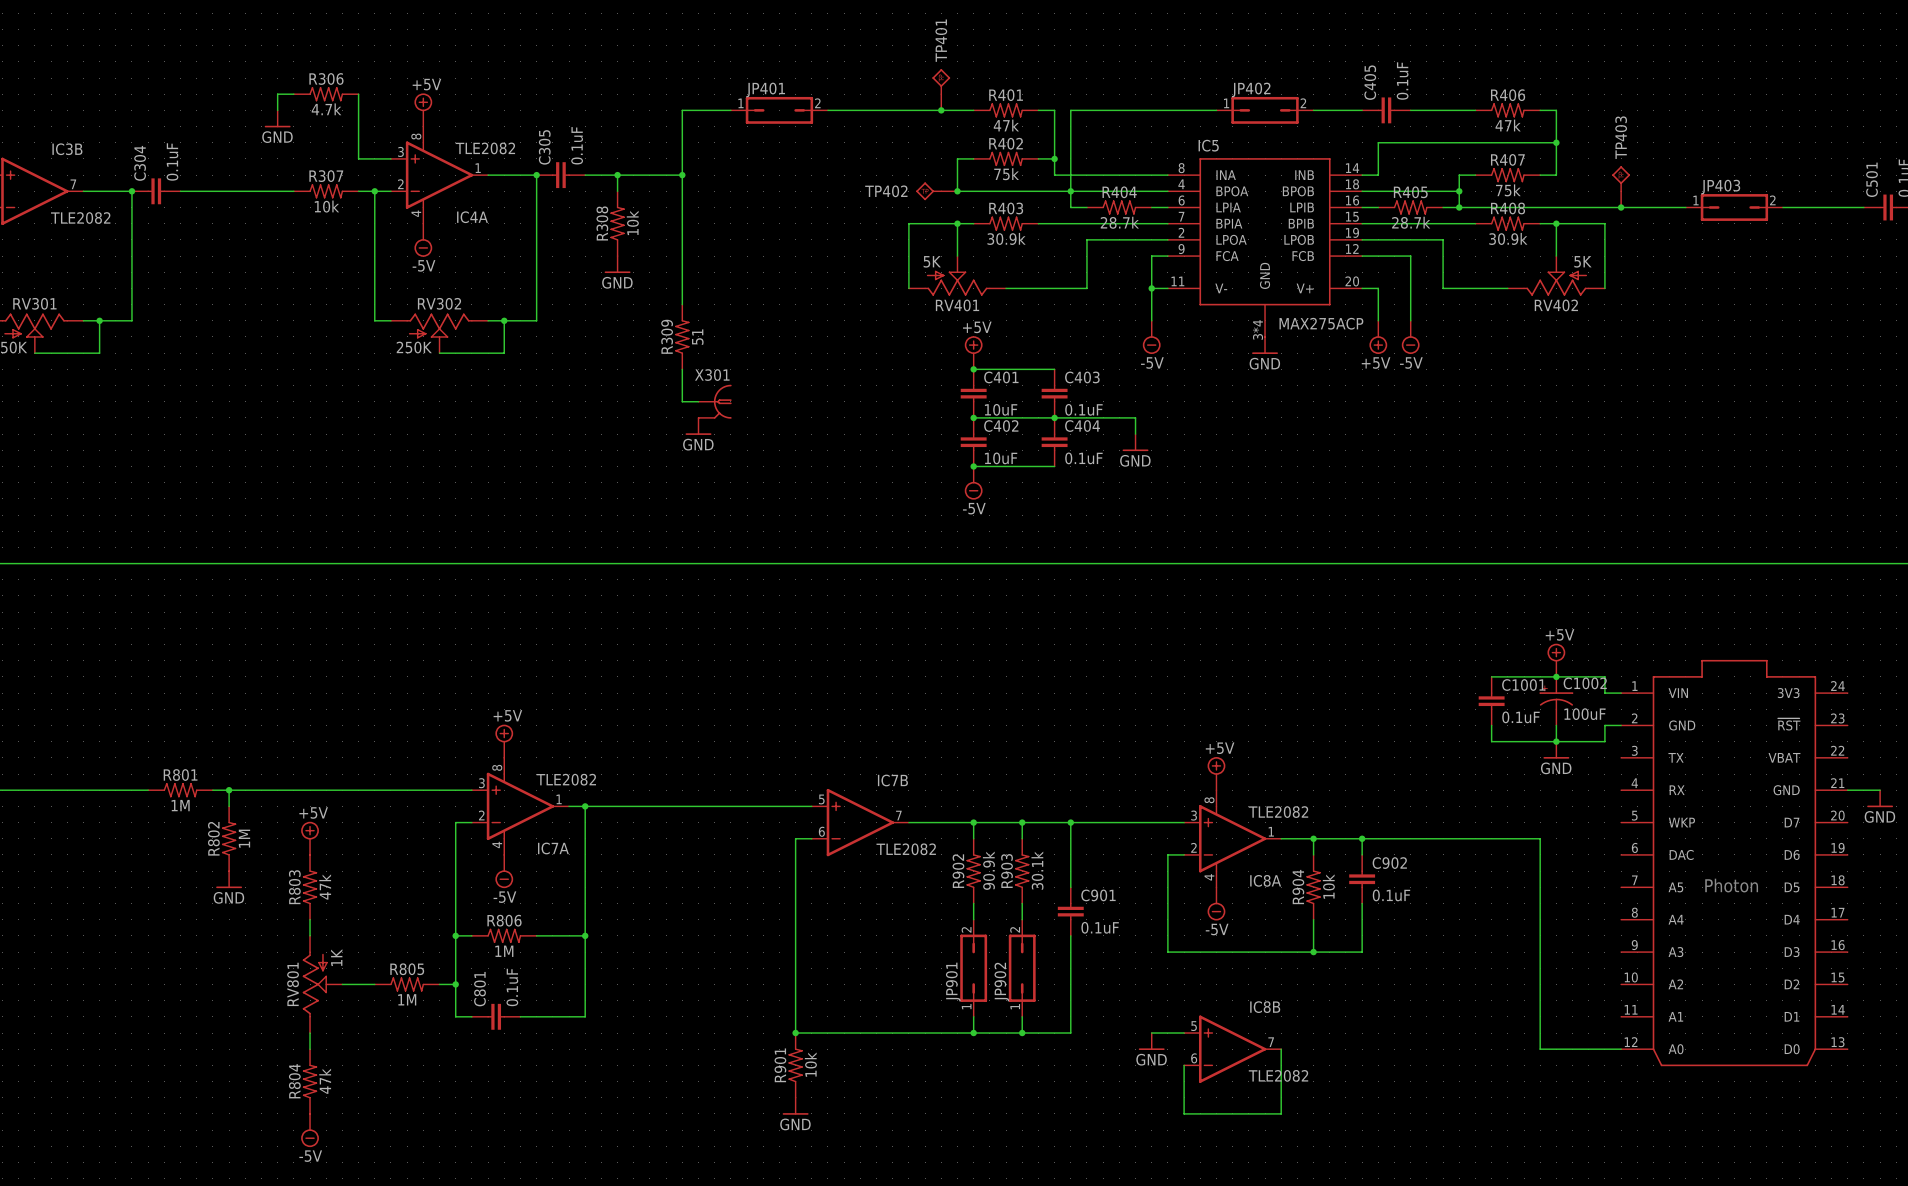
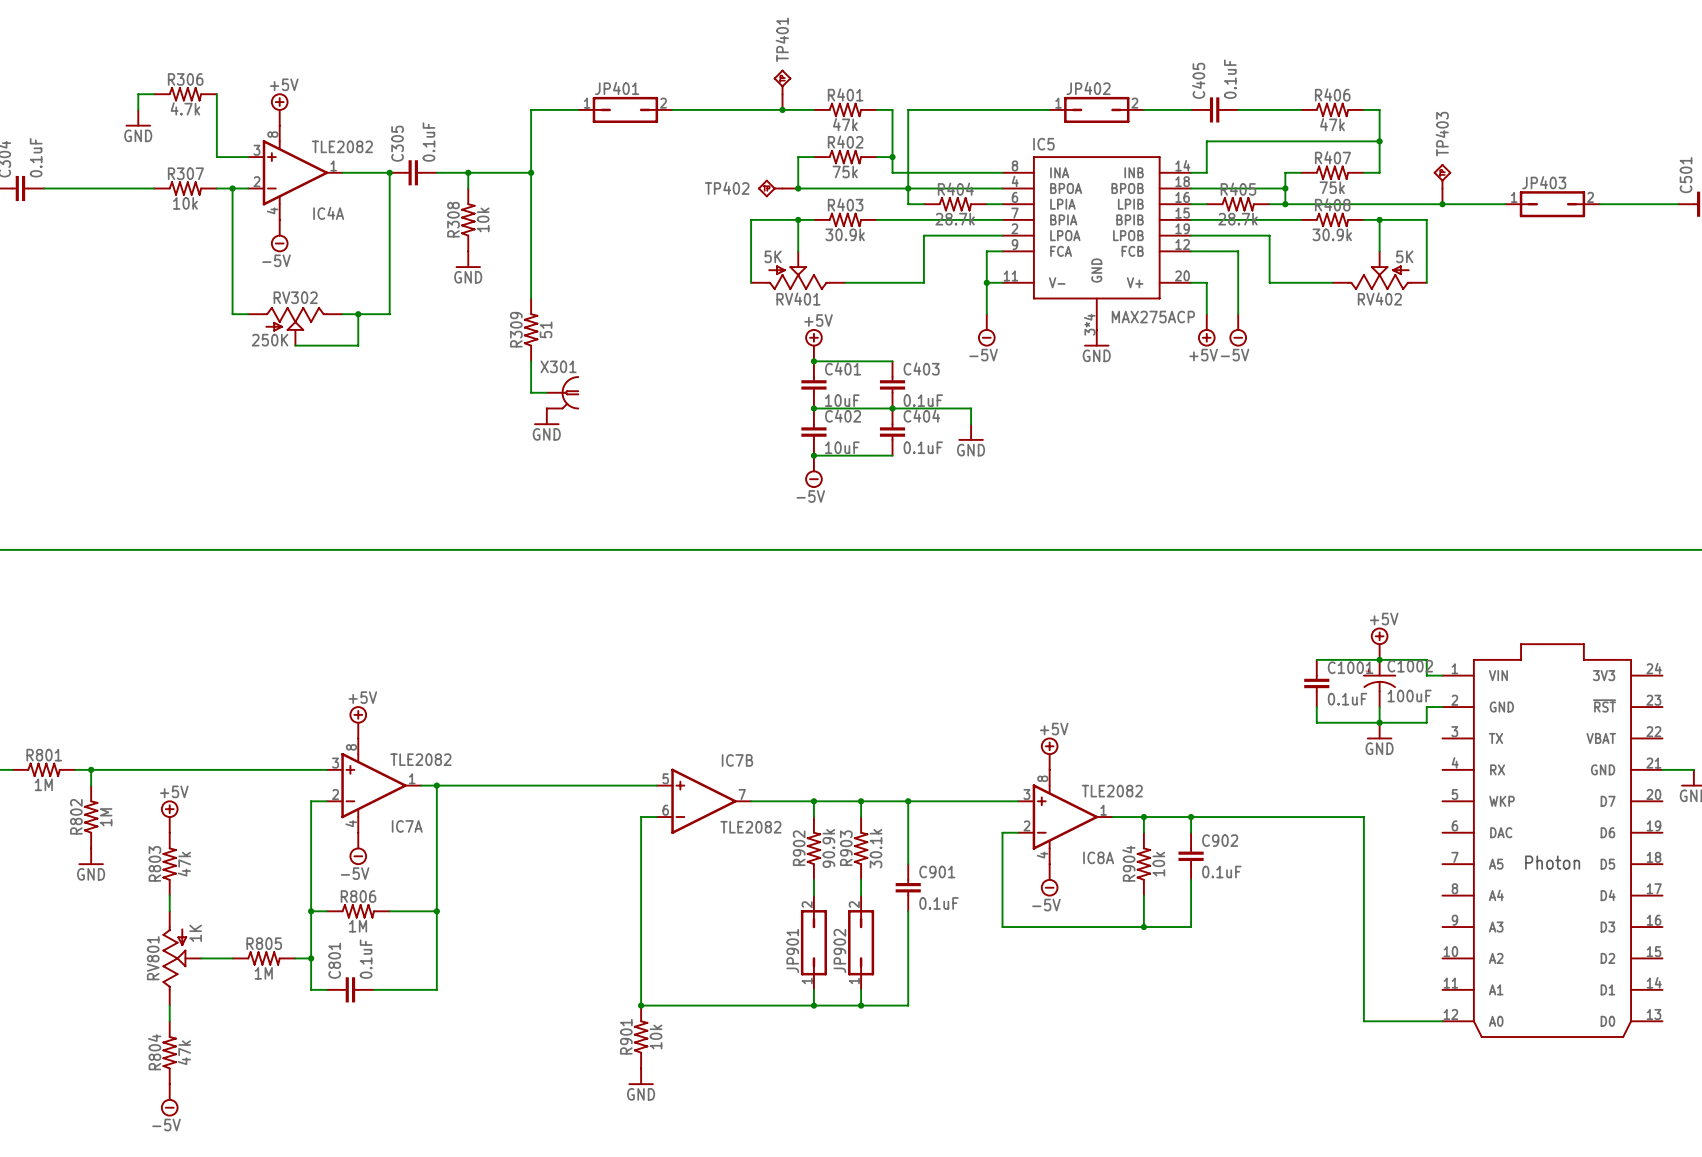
wire: (1151, 1033) (1184, 1033) -> none
power symbol: GND (1151, 1041) -> none
IC8B: TLE2082 (1232, 1049) -> none
wire: (1281, 1049) (1281, 1113) (1184, 1113) (1184, 1065) -> none

